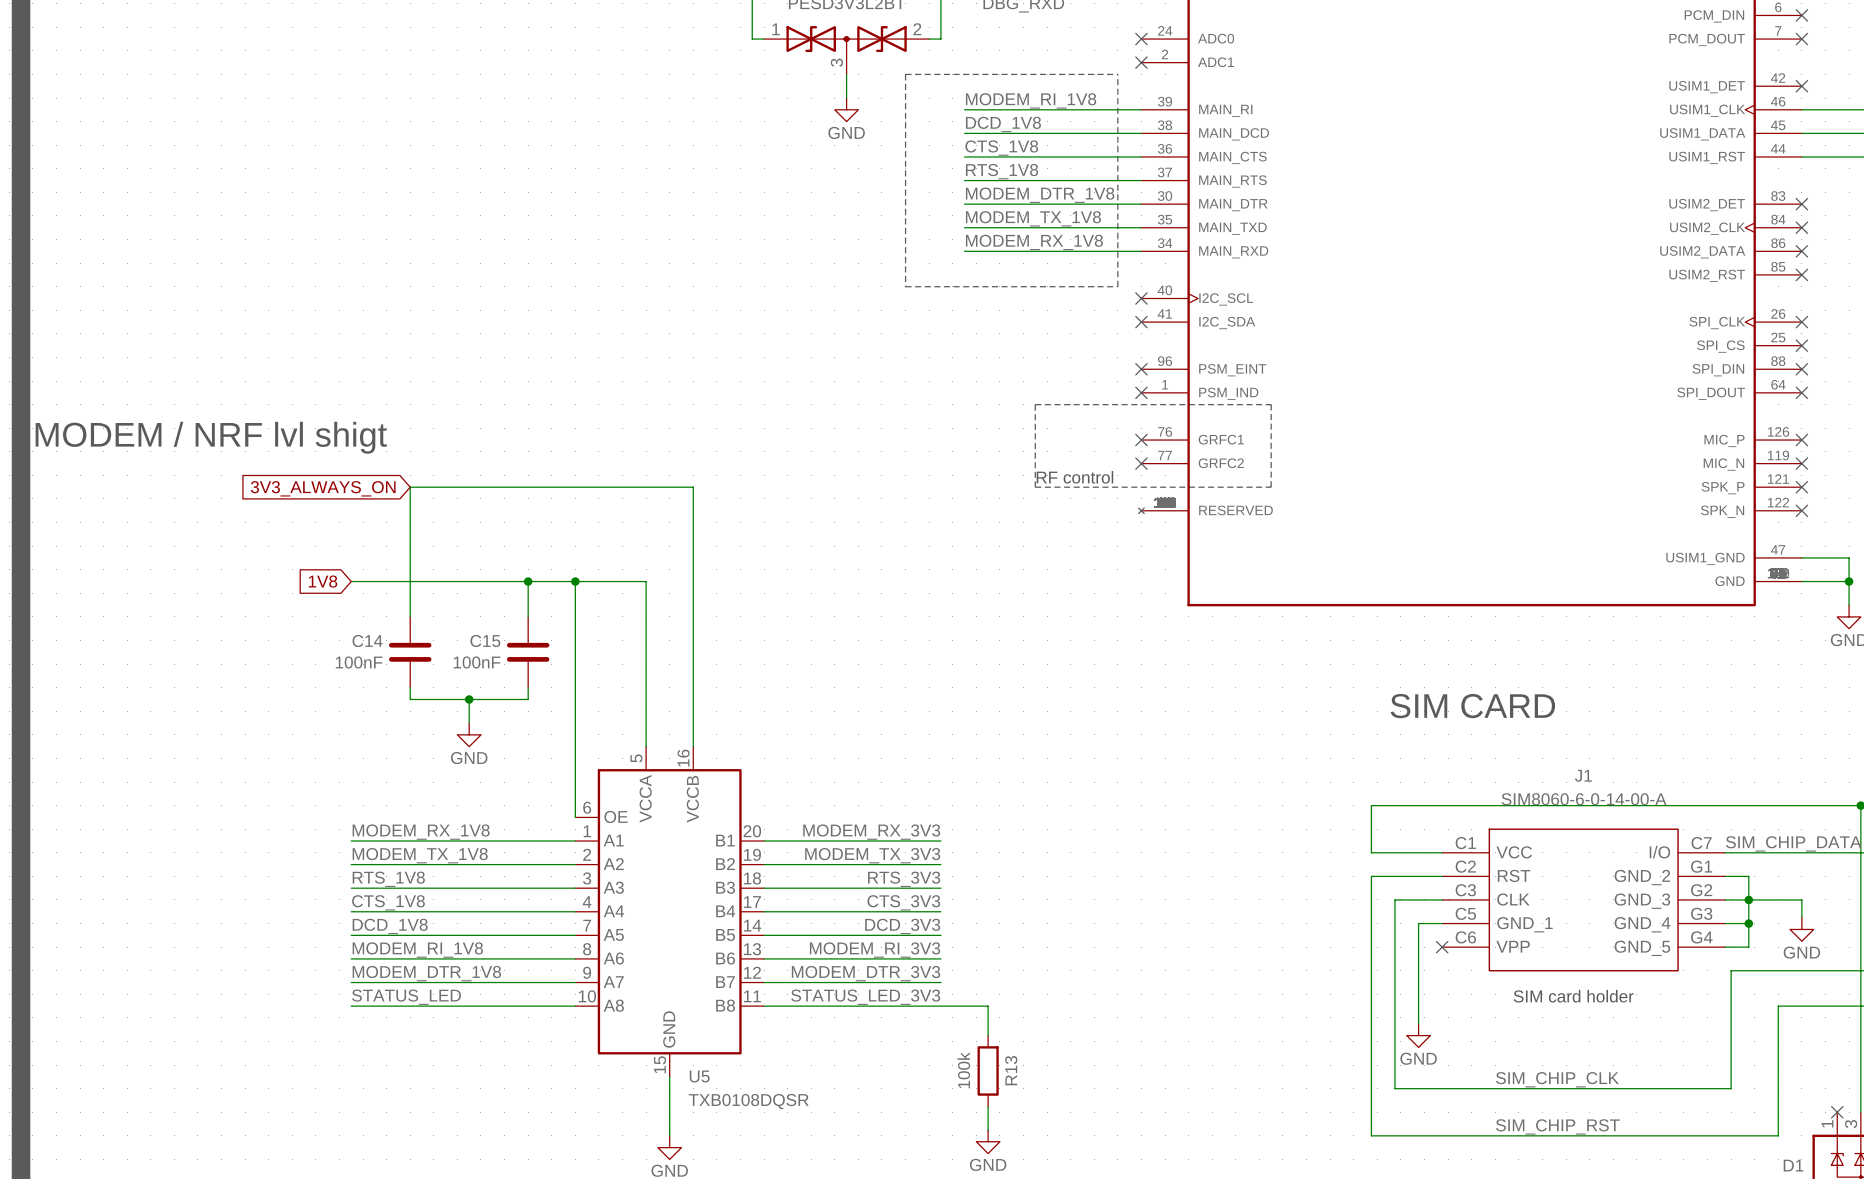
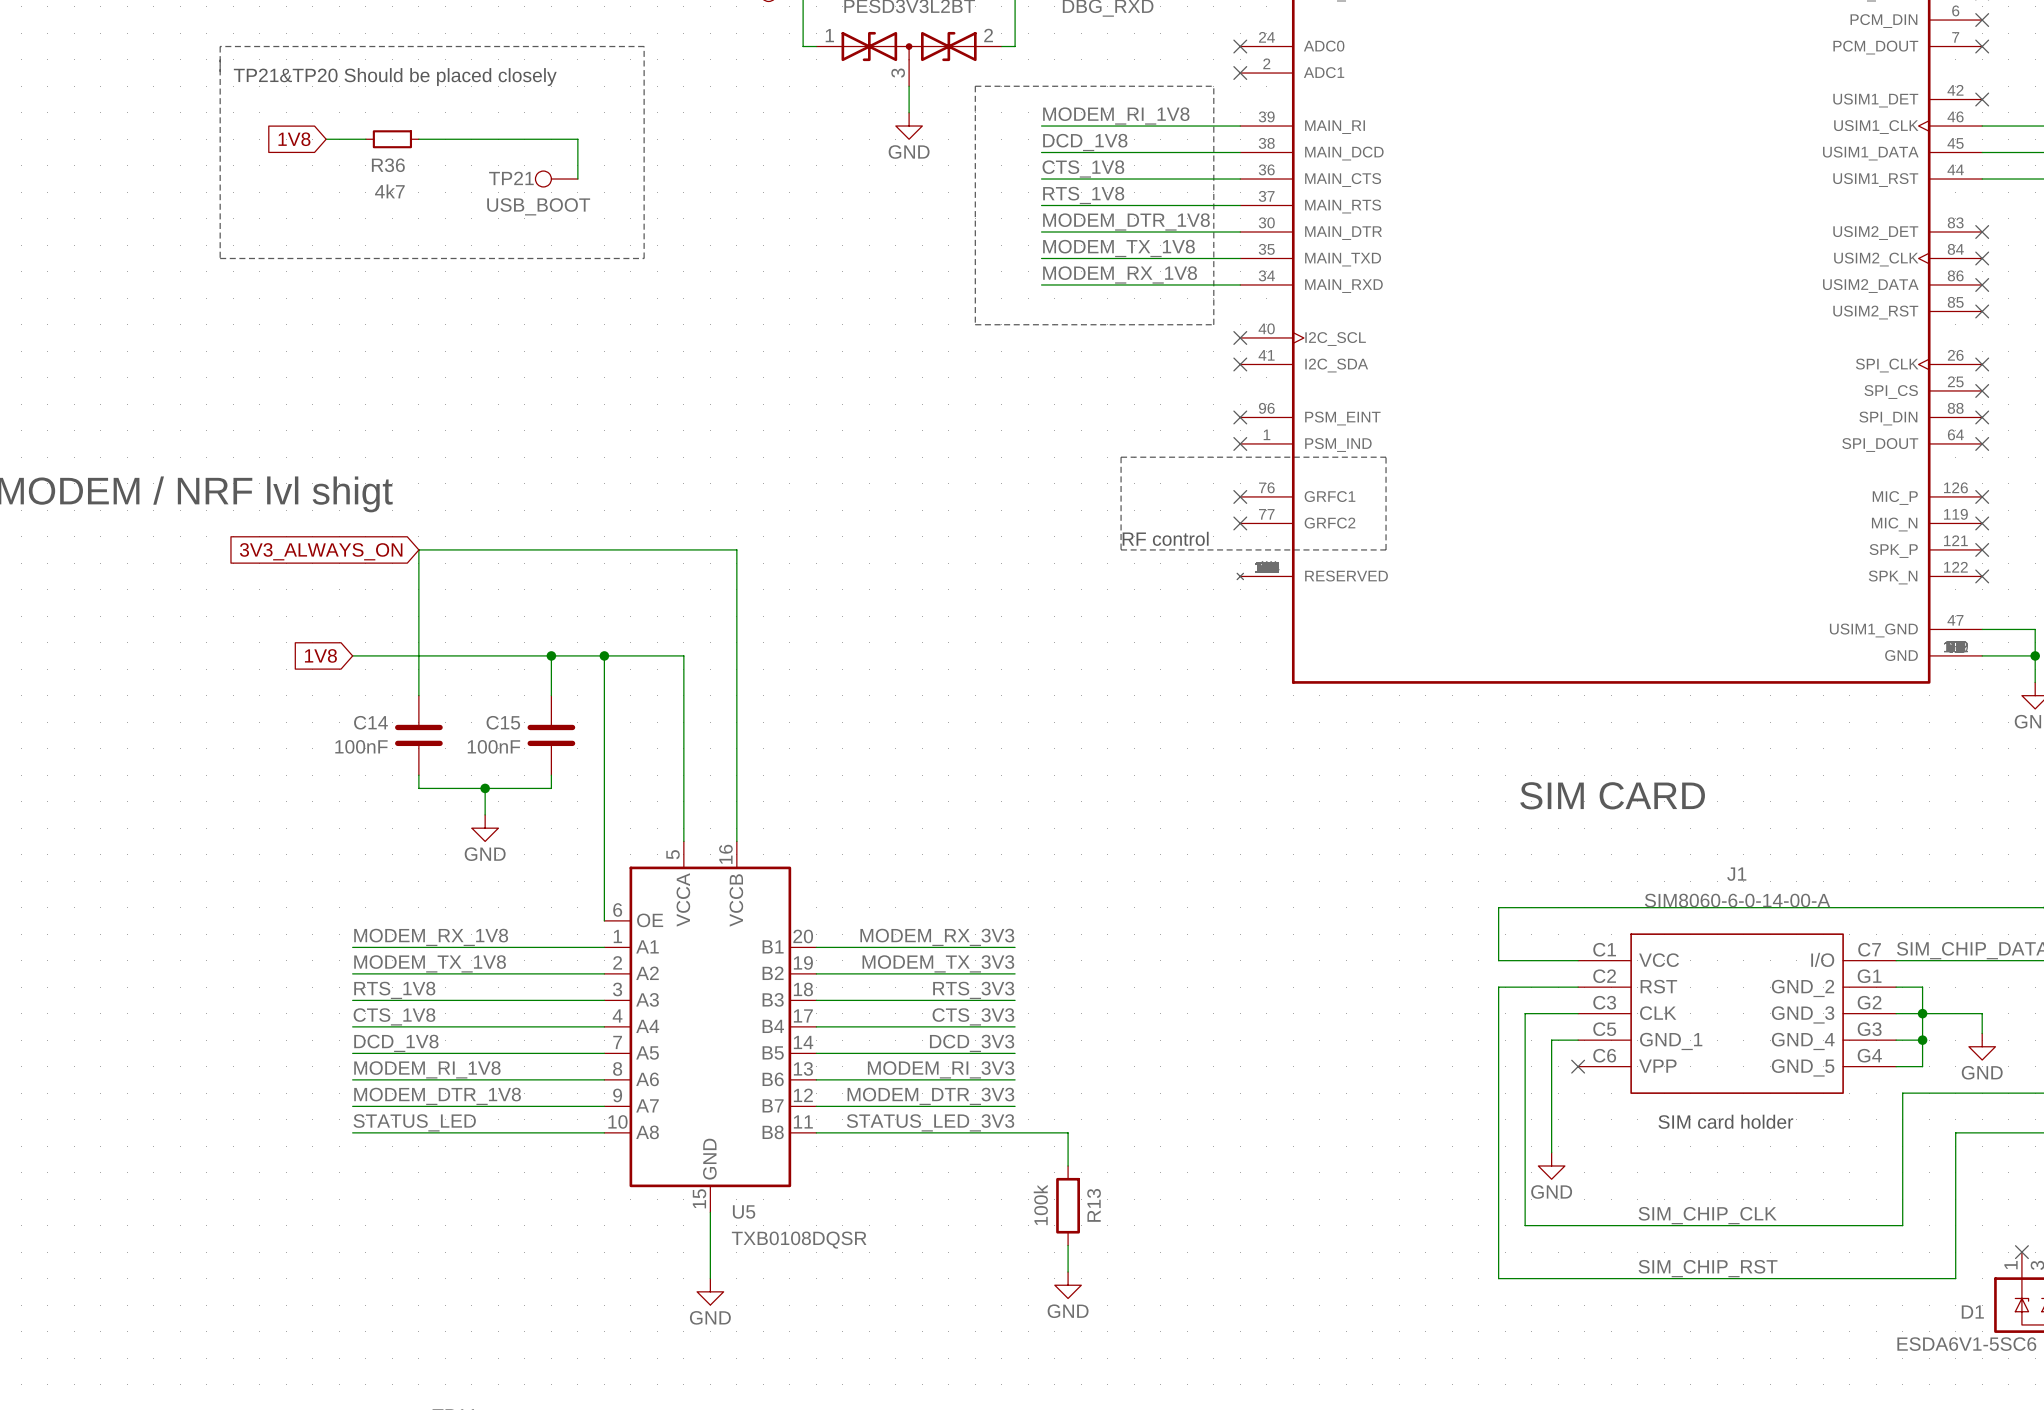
line: none -> (220, 46) (220, 258) (644, 258) (644, 46) (220, 46)
text: none -> TP21&TP20 Should be placed closely (395, 77)
global label: none -> 1V8 (294, 139)
wire: none -> (326, 139) (365, 139)
R36: none -> 4k7 (392, 139)
wire: none -> (418, 139) (577, 139) (577, 179)
TP21: none -> USB_BOOT (556, 179)

